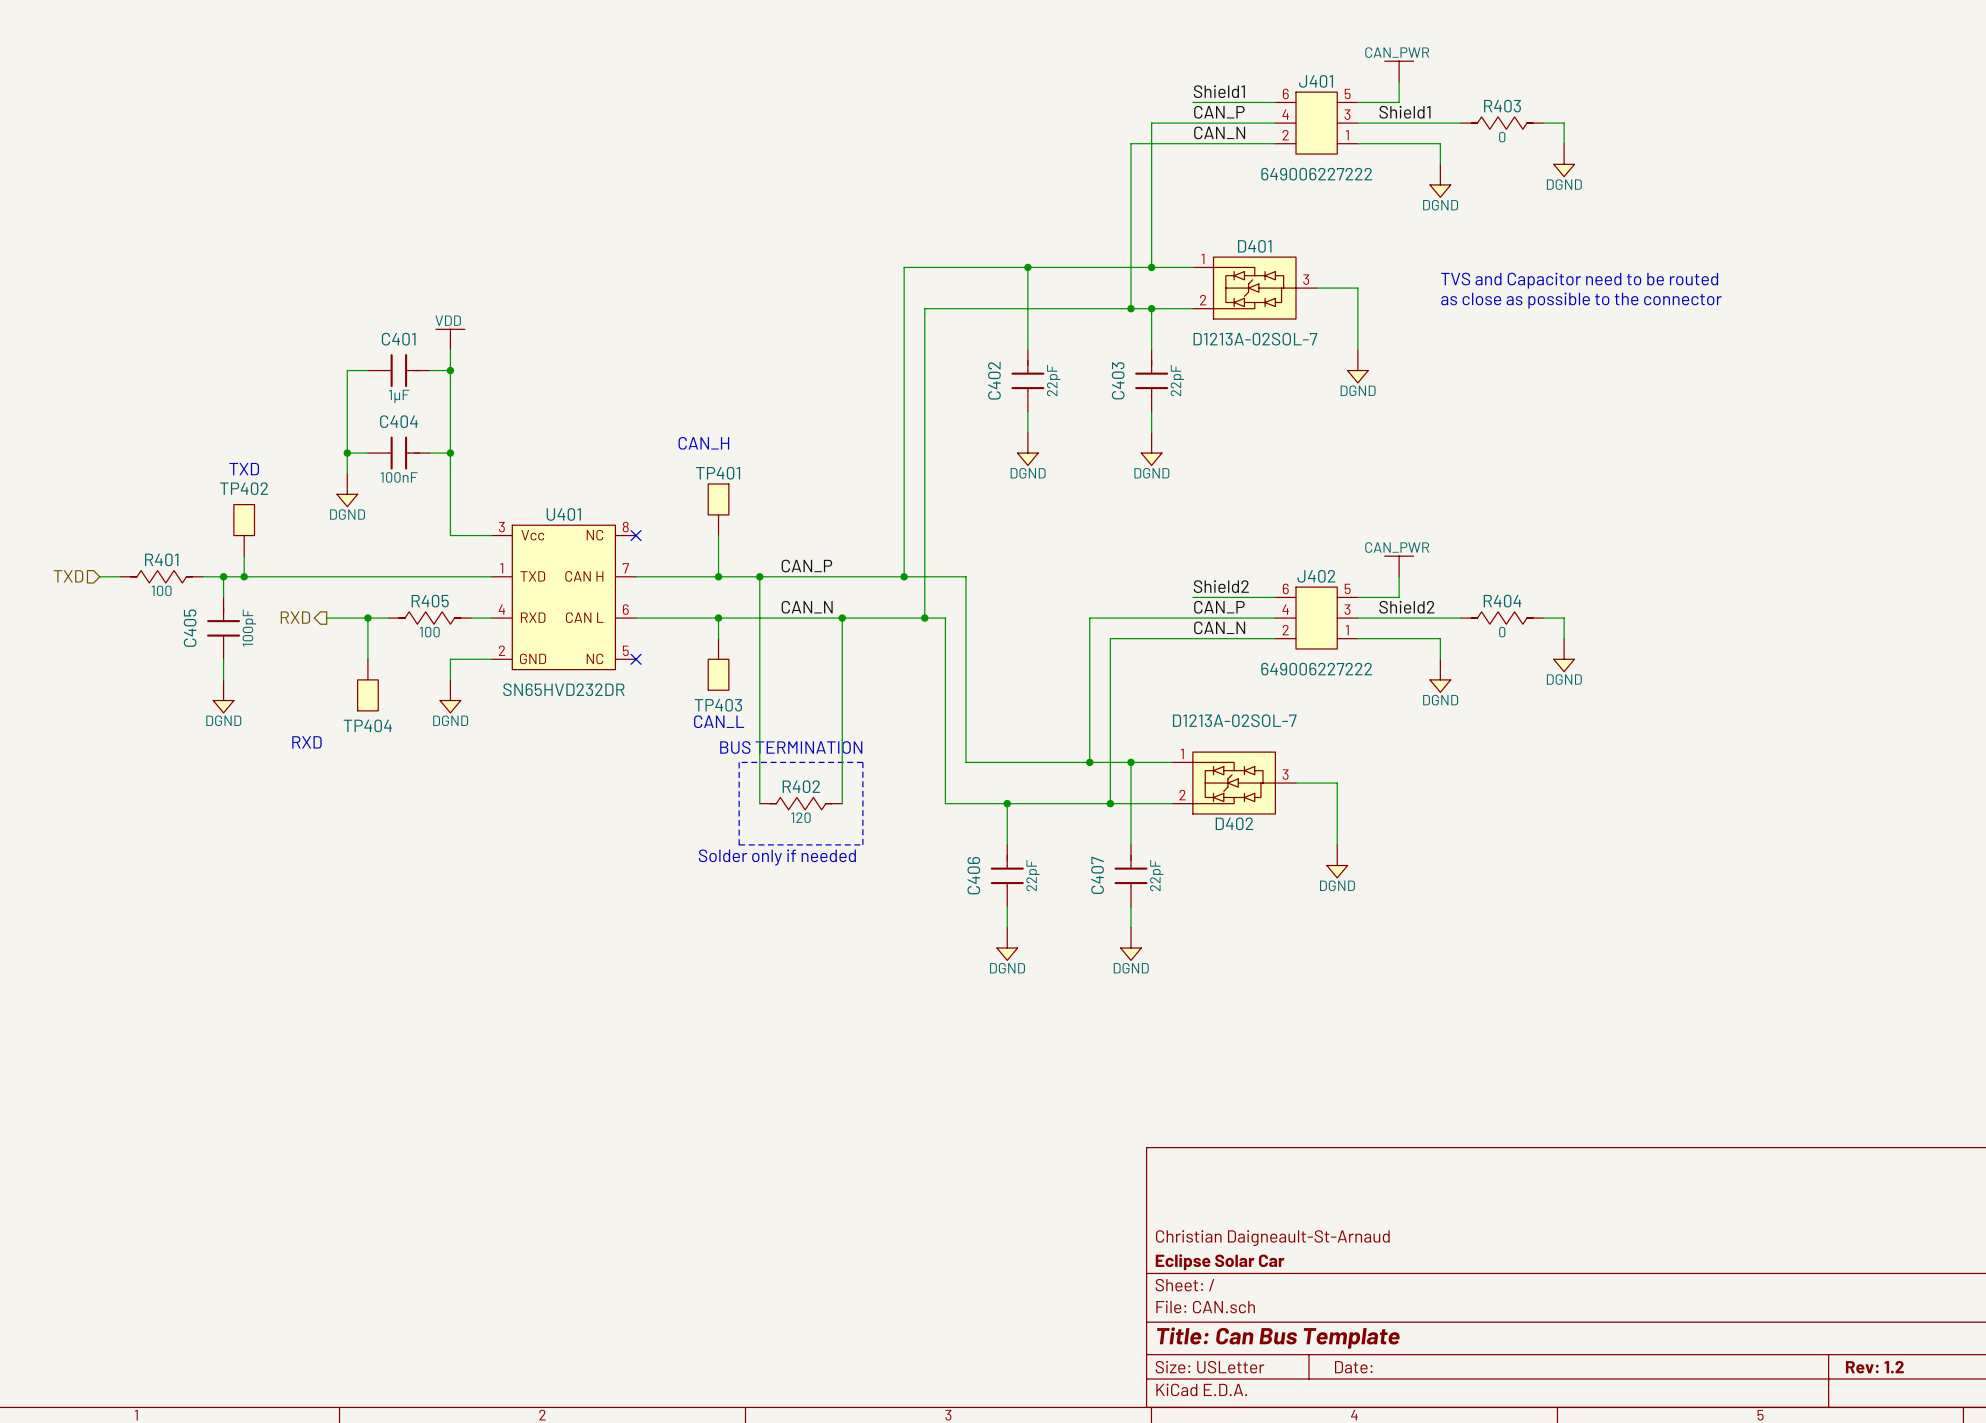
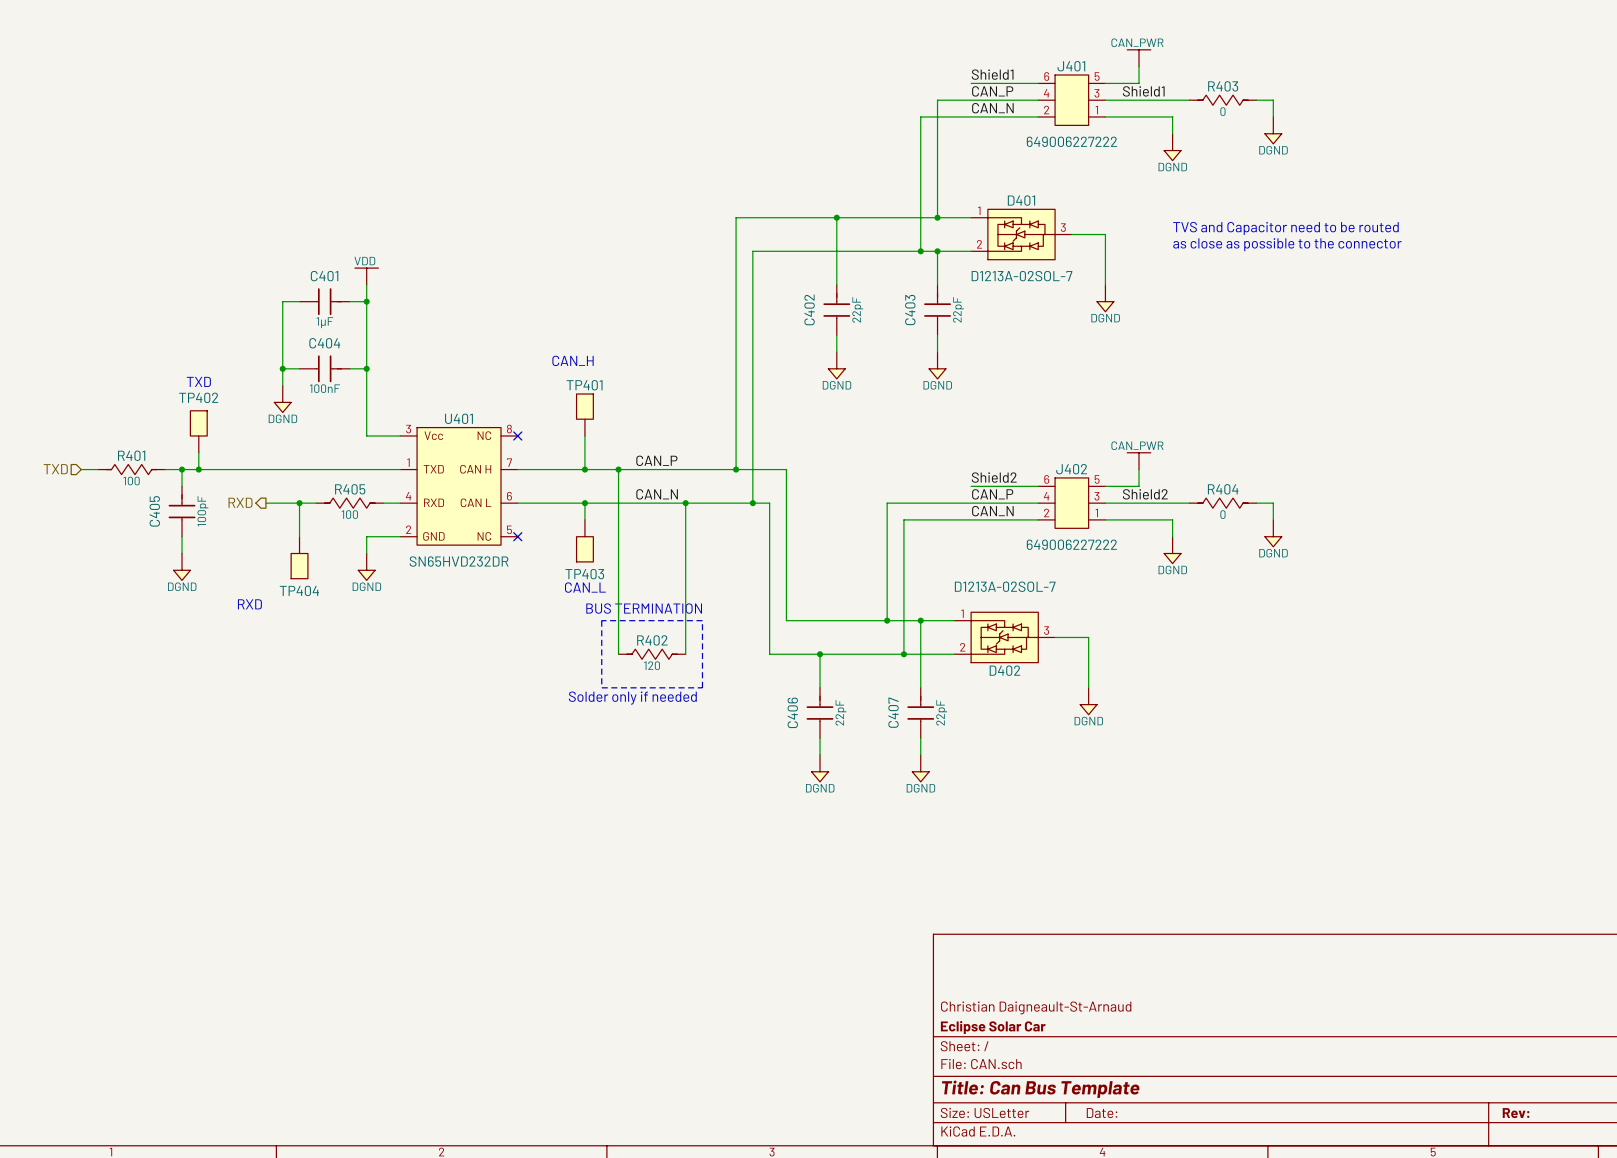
title block: Rev: 1.2 (1874, 1367) -> Rev: (1516, 1113)

